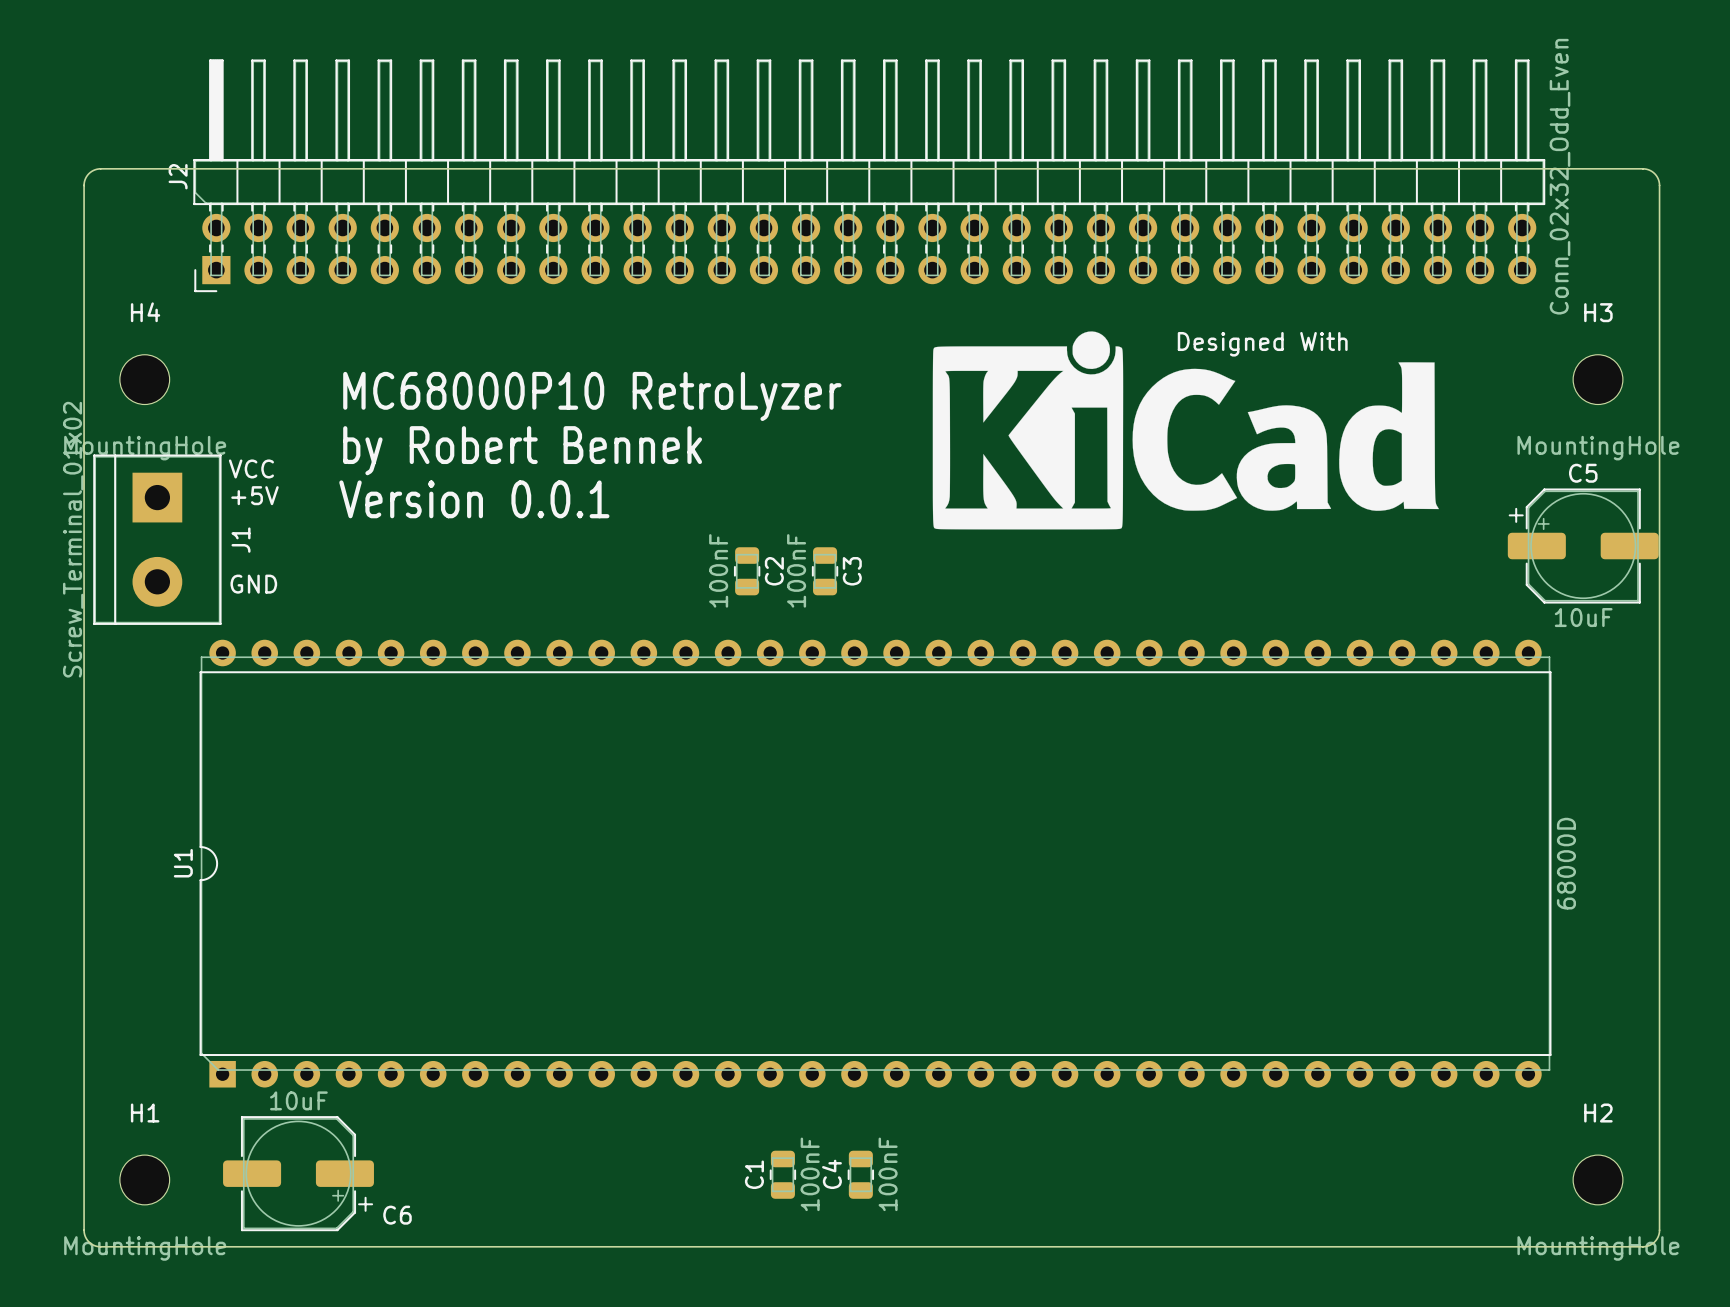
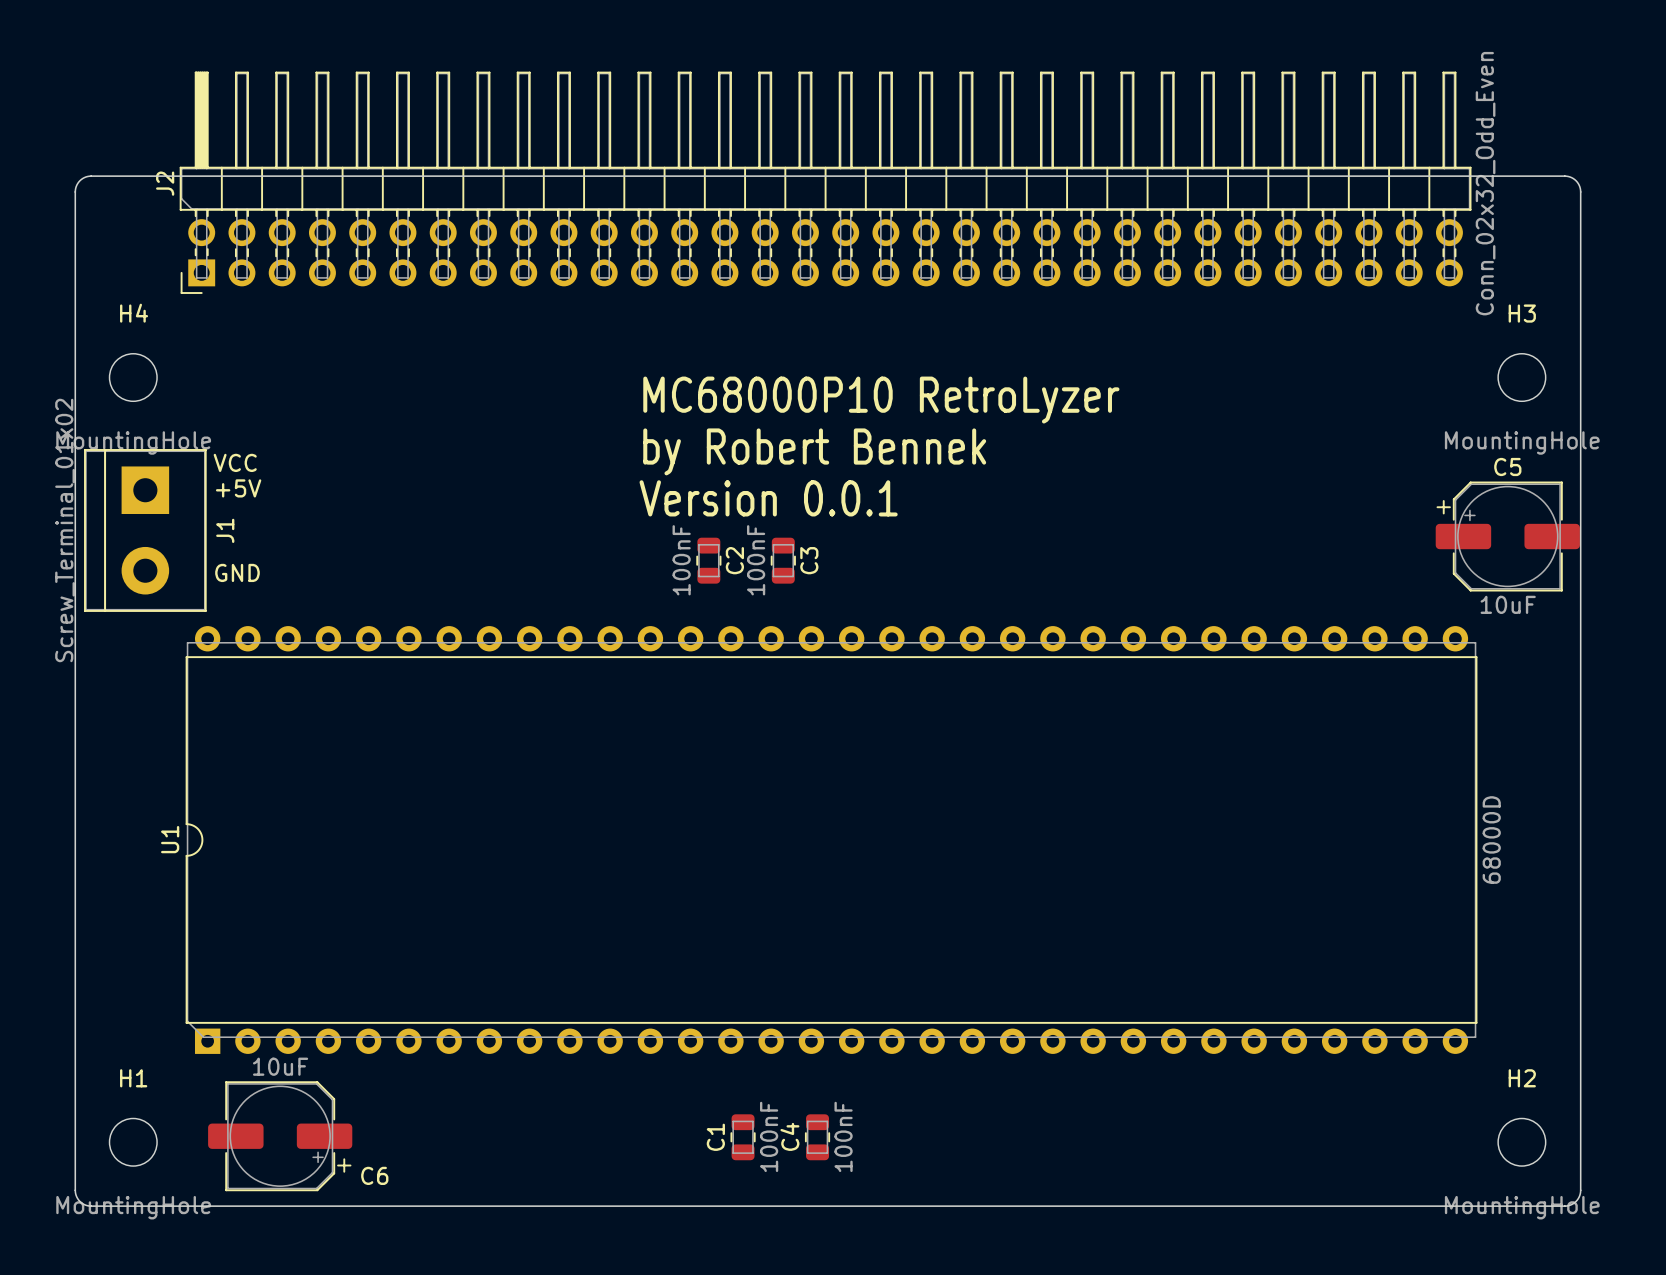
drawing: [932, 331, 1439, 530] -> none
text: Designed With (1262, 344) -> none
text position: MC68000P10 RetroLyzer (592, 396) -> MC68000P10 RetroLyzer (881, 400)
text position: by Robert Bennek (522, 450) -> by Robert Bennek (814, 451)
text position: Version 0.0.1 (474, 499) -> Version 0.0.1 (768, 498)

